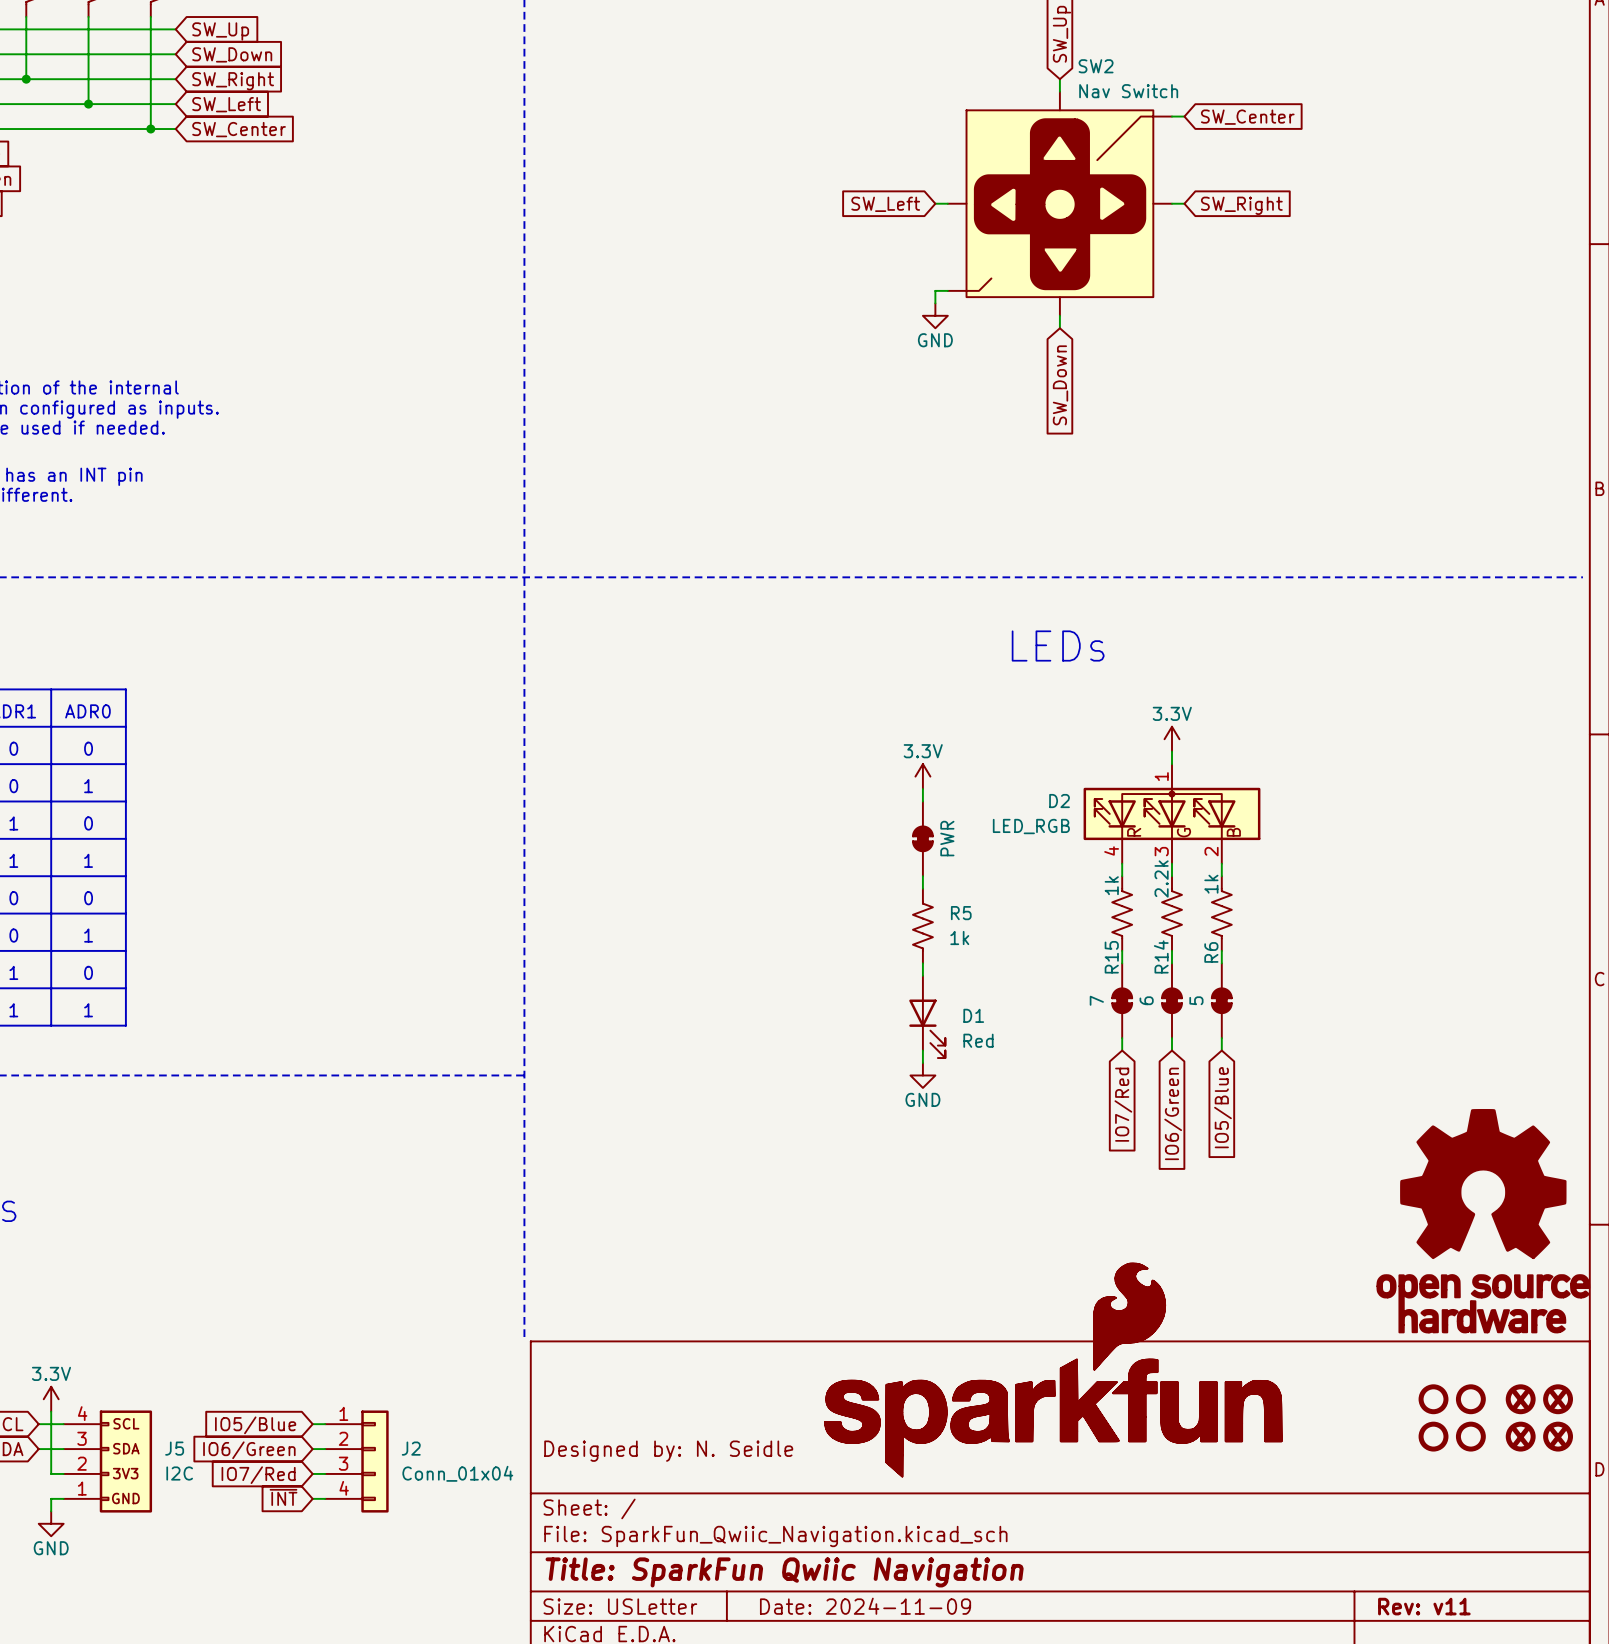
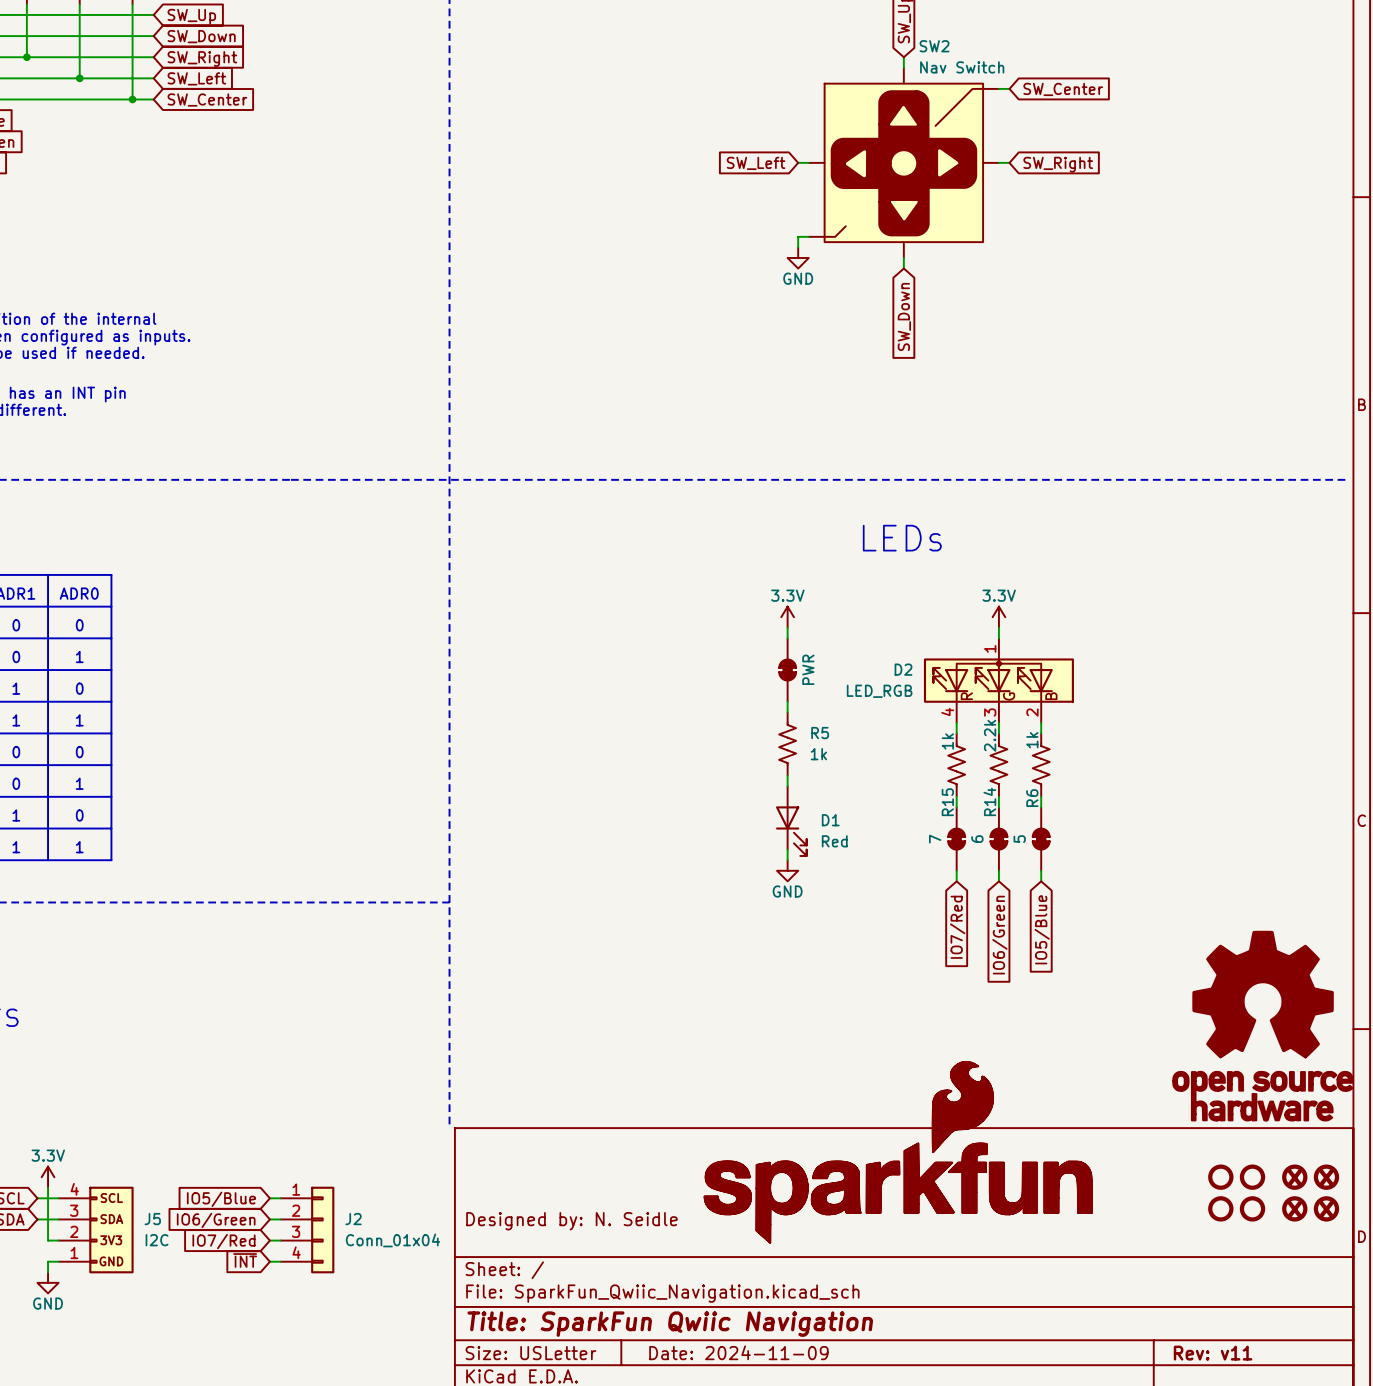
power symbol position: 3.3V (922, 776) -> 3.3V (787, 617)
part position: (922, 838) -> (787, 670)
R5 position: (922, 926) -> (787, 744)
D1 position: (927, 1016) -> (791, 821)
power symbol position: GND (922, 1075) -> GND (787, 870)

